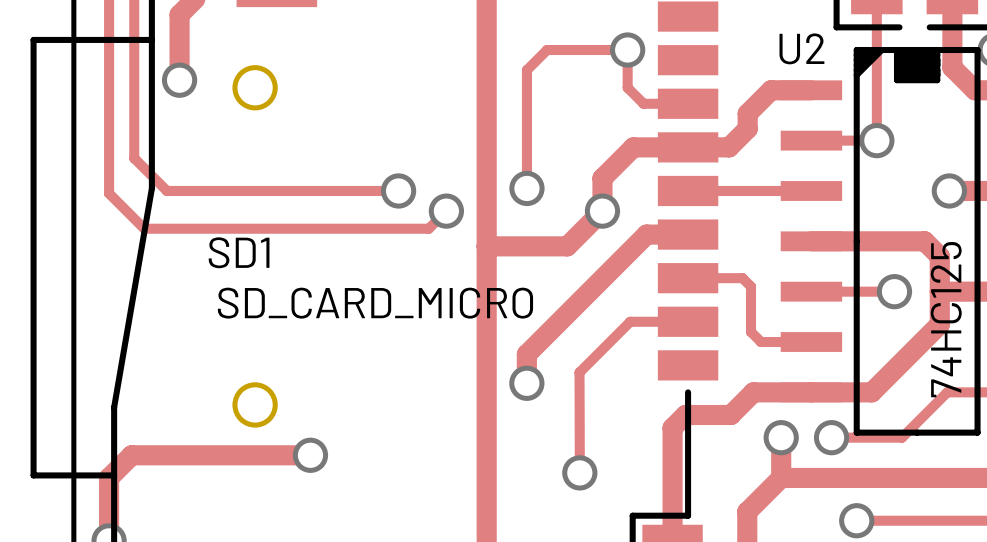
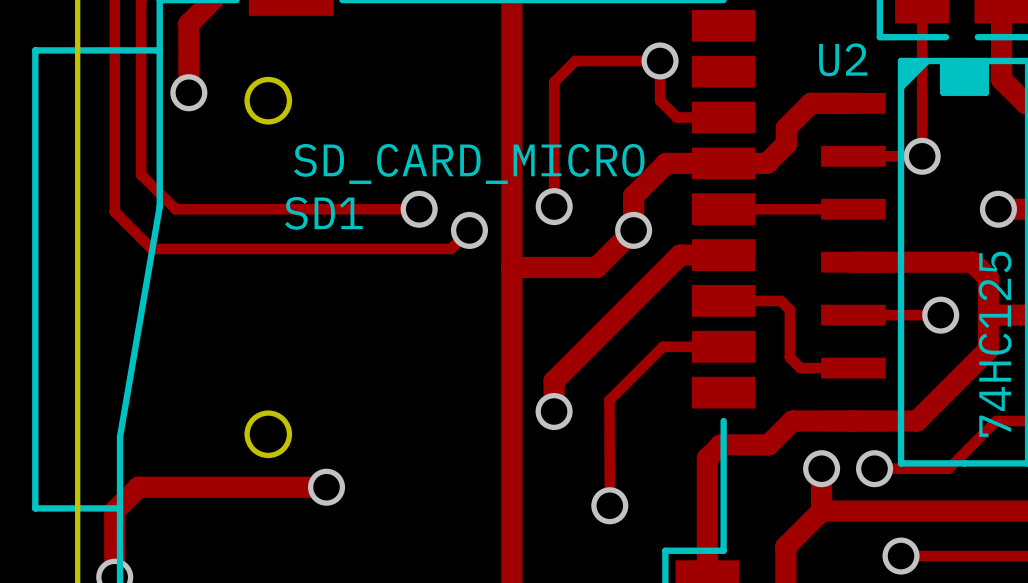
SD1 name position: SD1 (239, 252) -> SD1 (323, 213)
SD1 value position: SD_CARD_MICRO (375, 303) -> SD_CARD_MICRO (469, 163)

